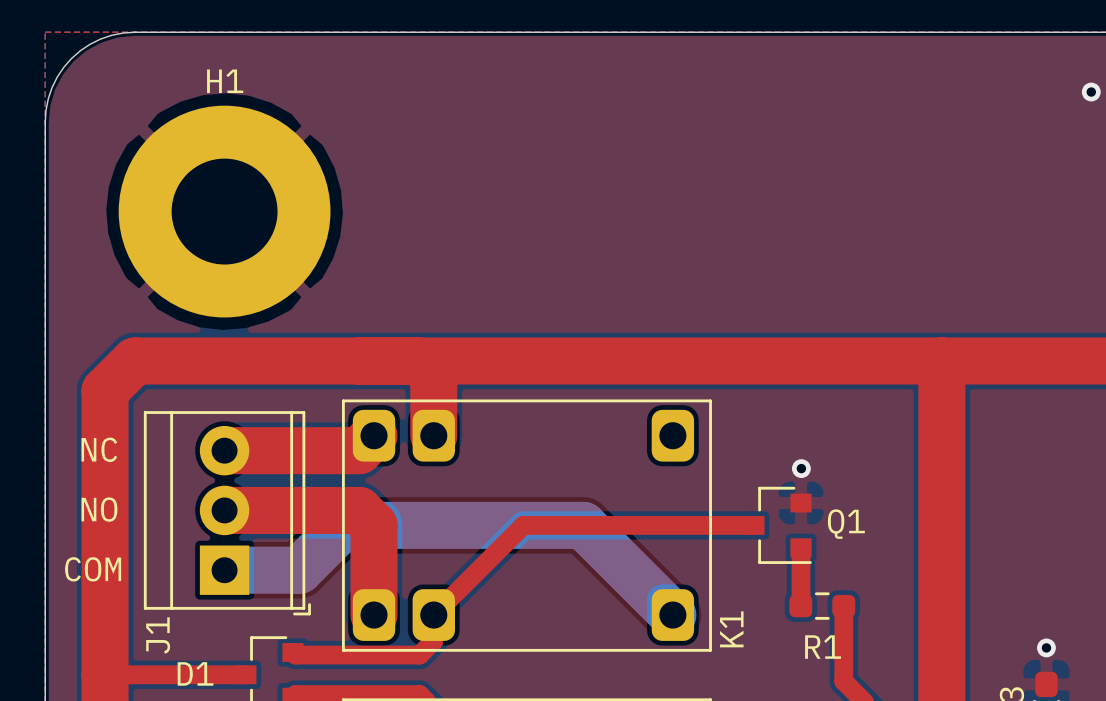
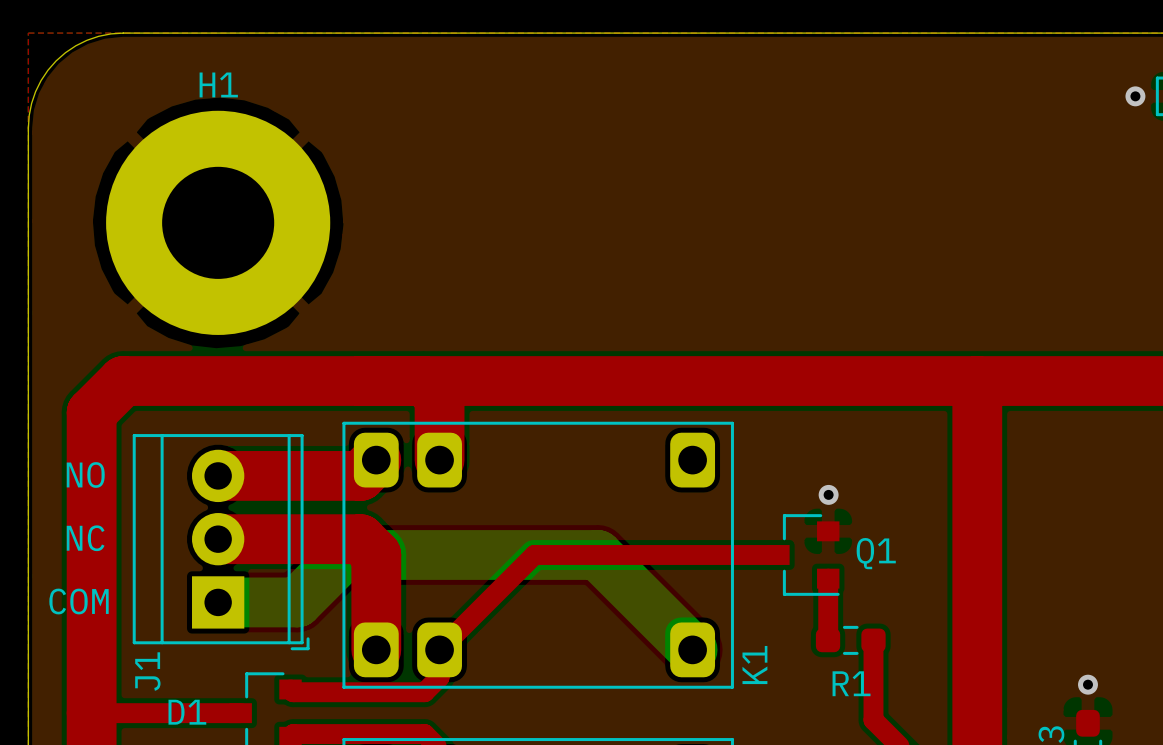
text: NC (99, 449) -> NO (85, 474)
text: NO (99, 509) -> NC (85, 538)

